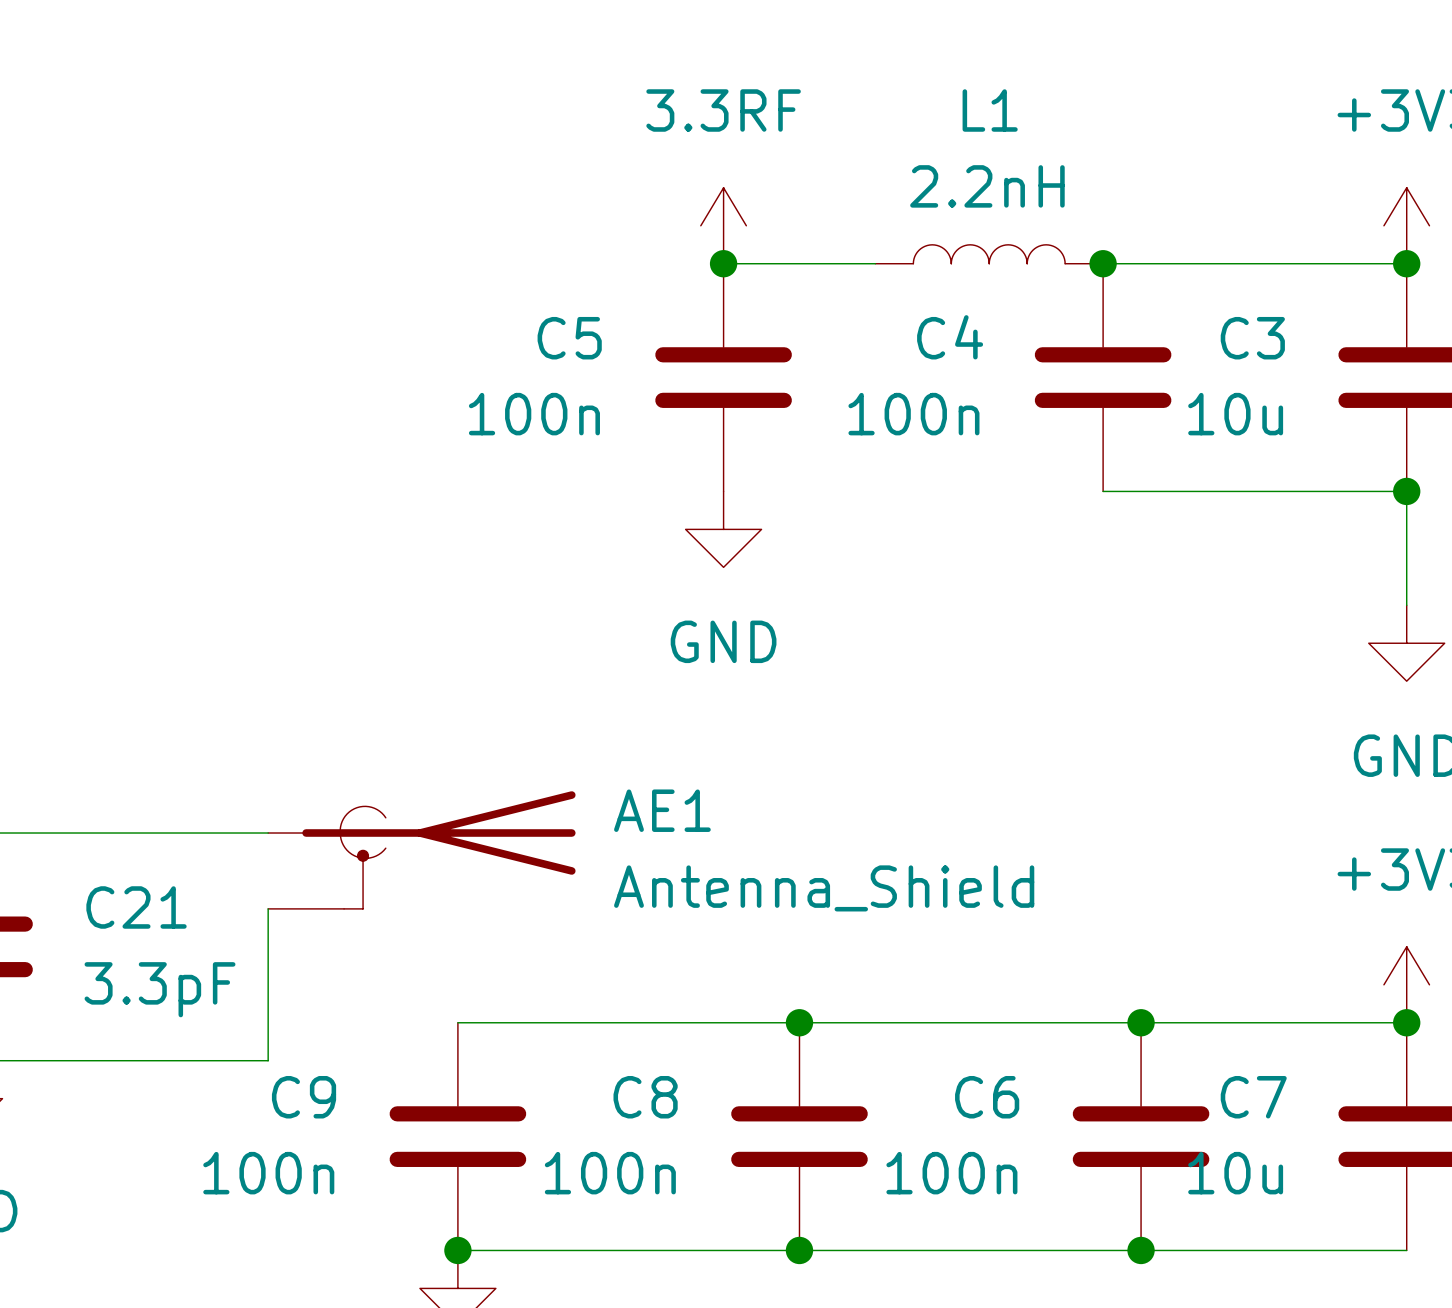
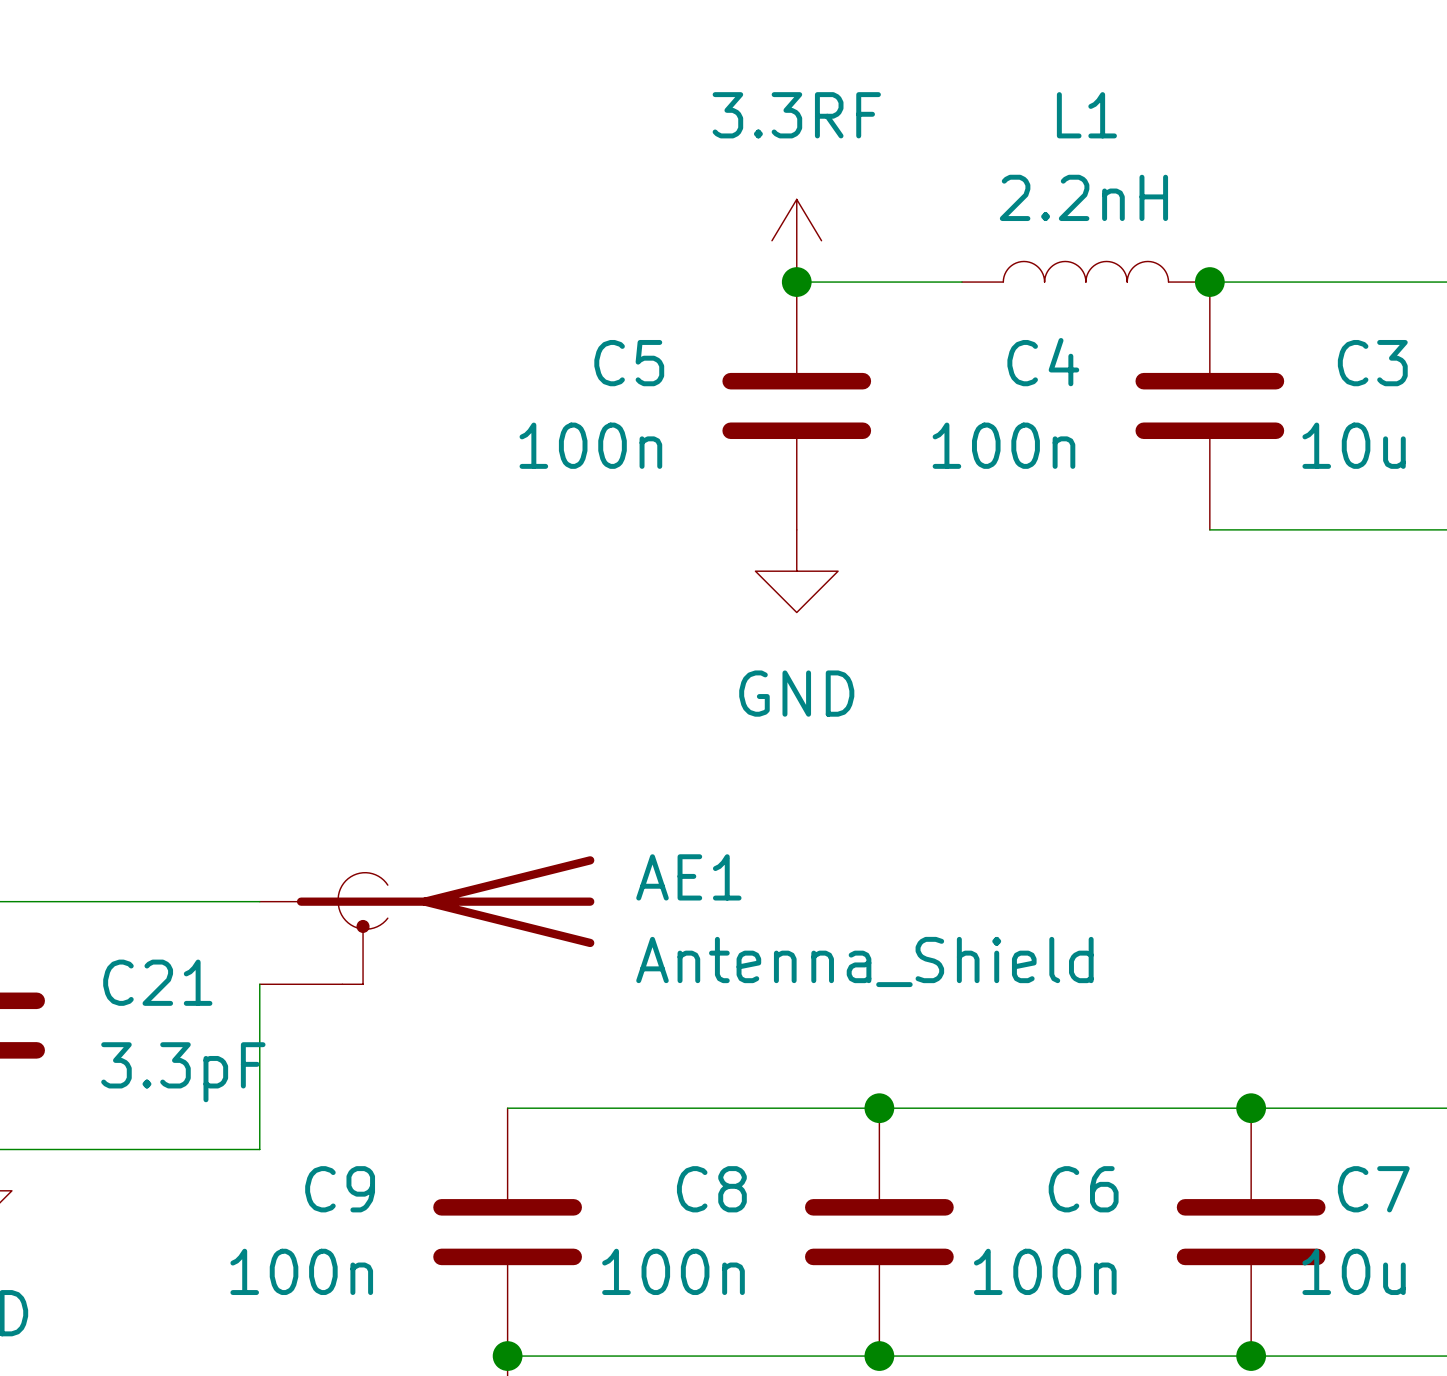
AE1 position: (421, 850) -> (427, 920)
wire: (268, 908) (268, 1060) (230, 1060) -> (259, 984) (259, 1149)

